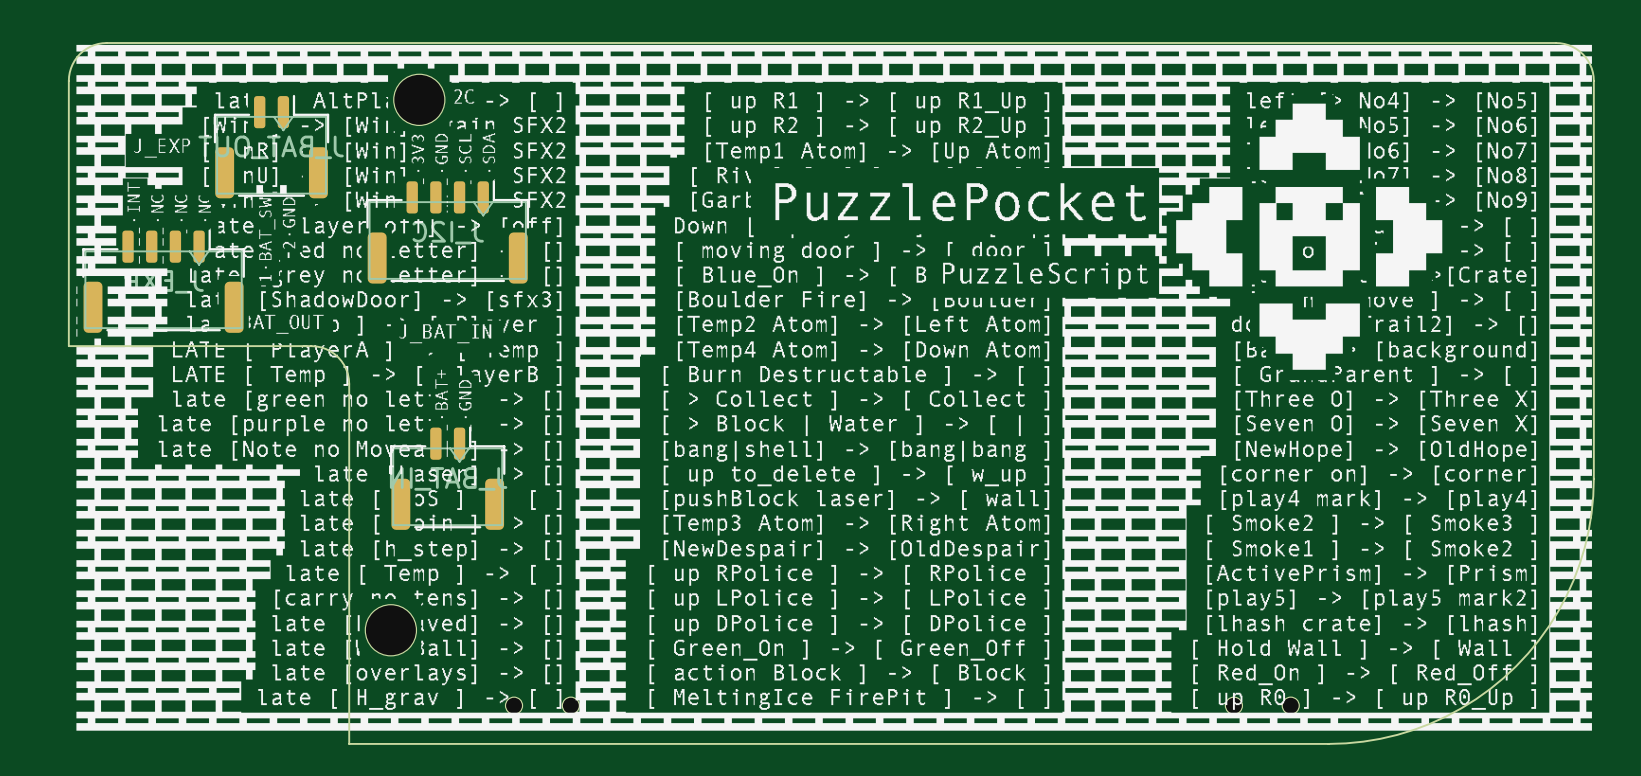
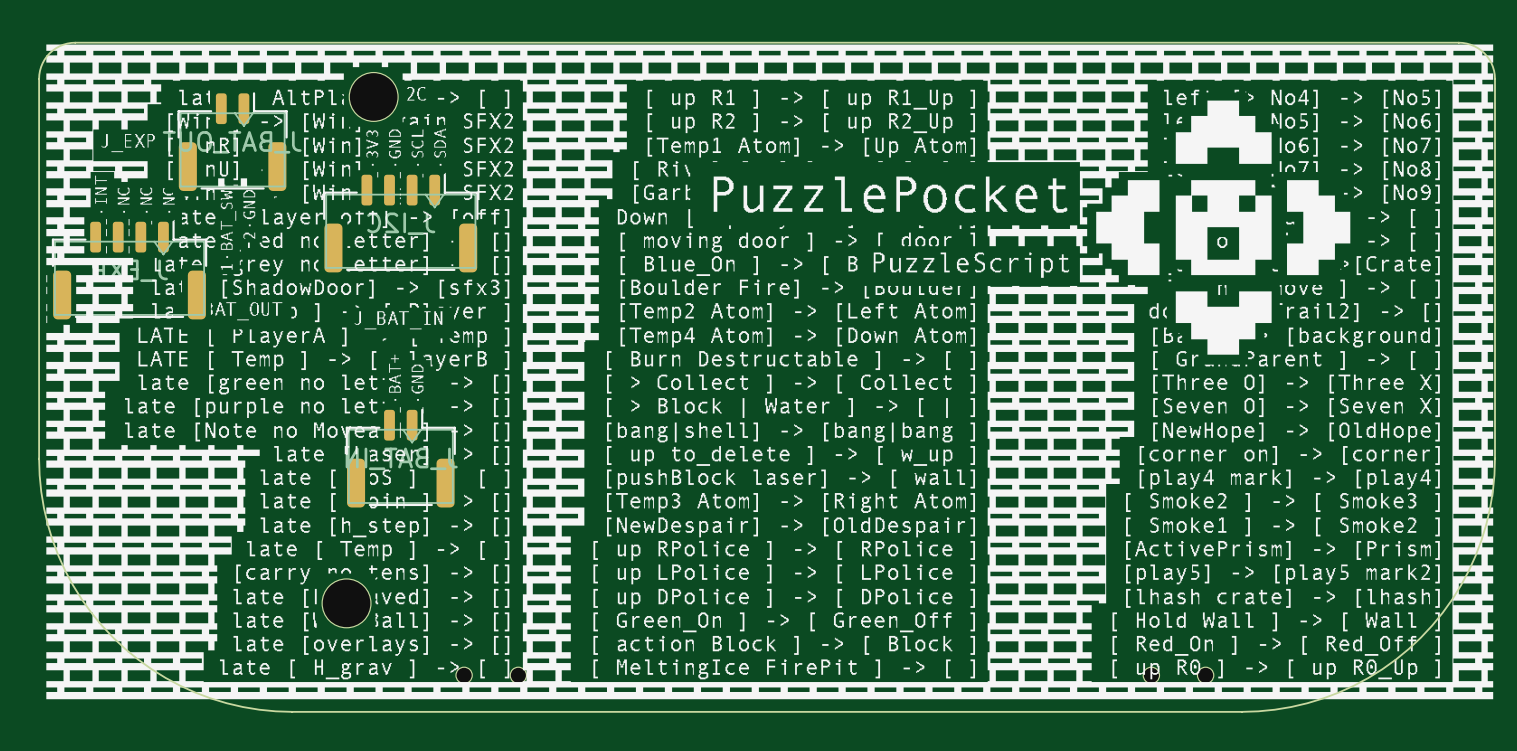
board edge: (68, 346) (311, 346) (330, 351) (341, 360) (347, 374) (349, 384) (349, 743) -> (39, 332) (39, 458) (41, 491) (47, 524) (58, 555) (81, 599) (101, 625) (125, 649) (151, 669) (180, 685) (210, 698) (242, 707) (275, 711) (306, 711)

